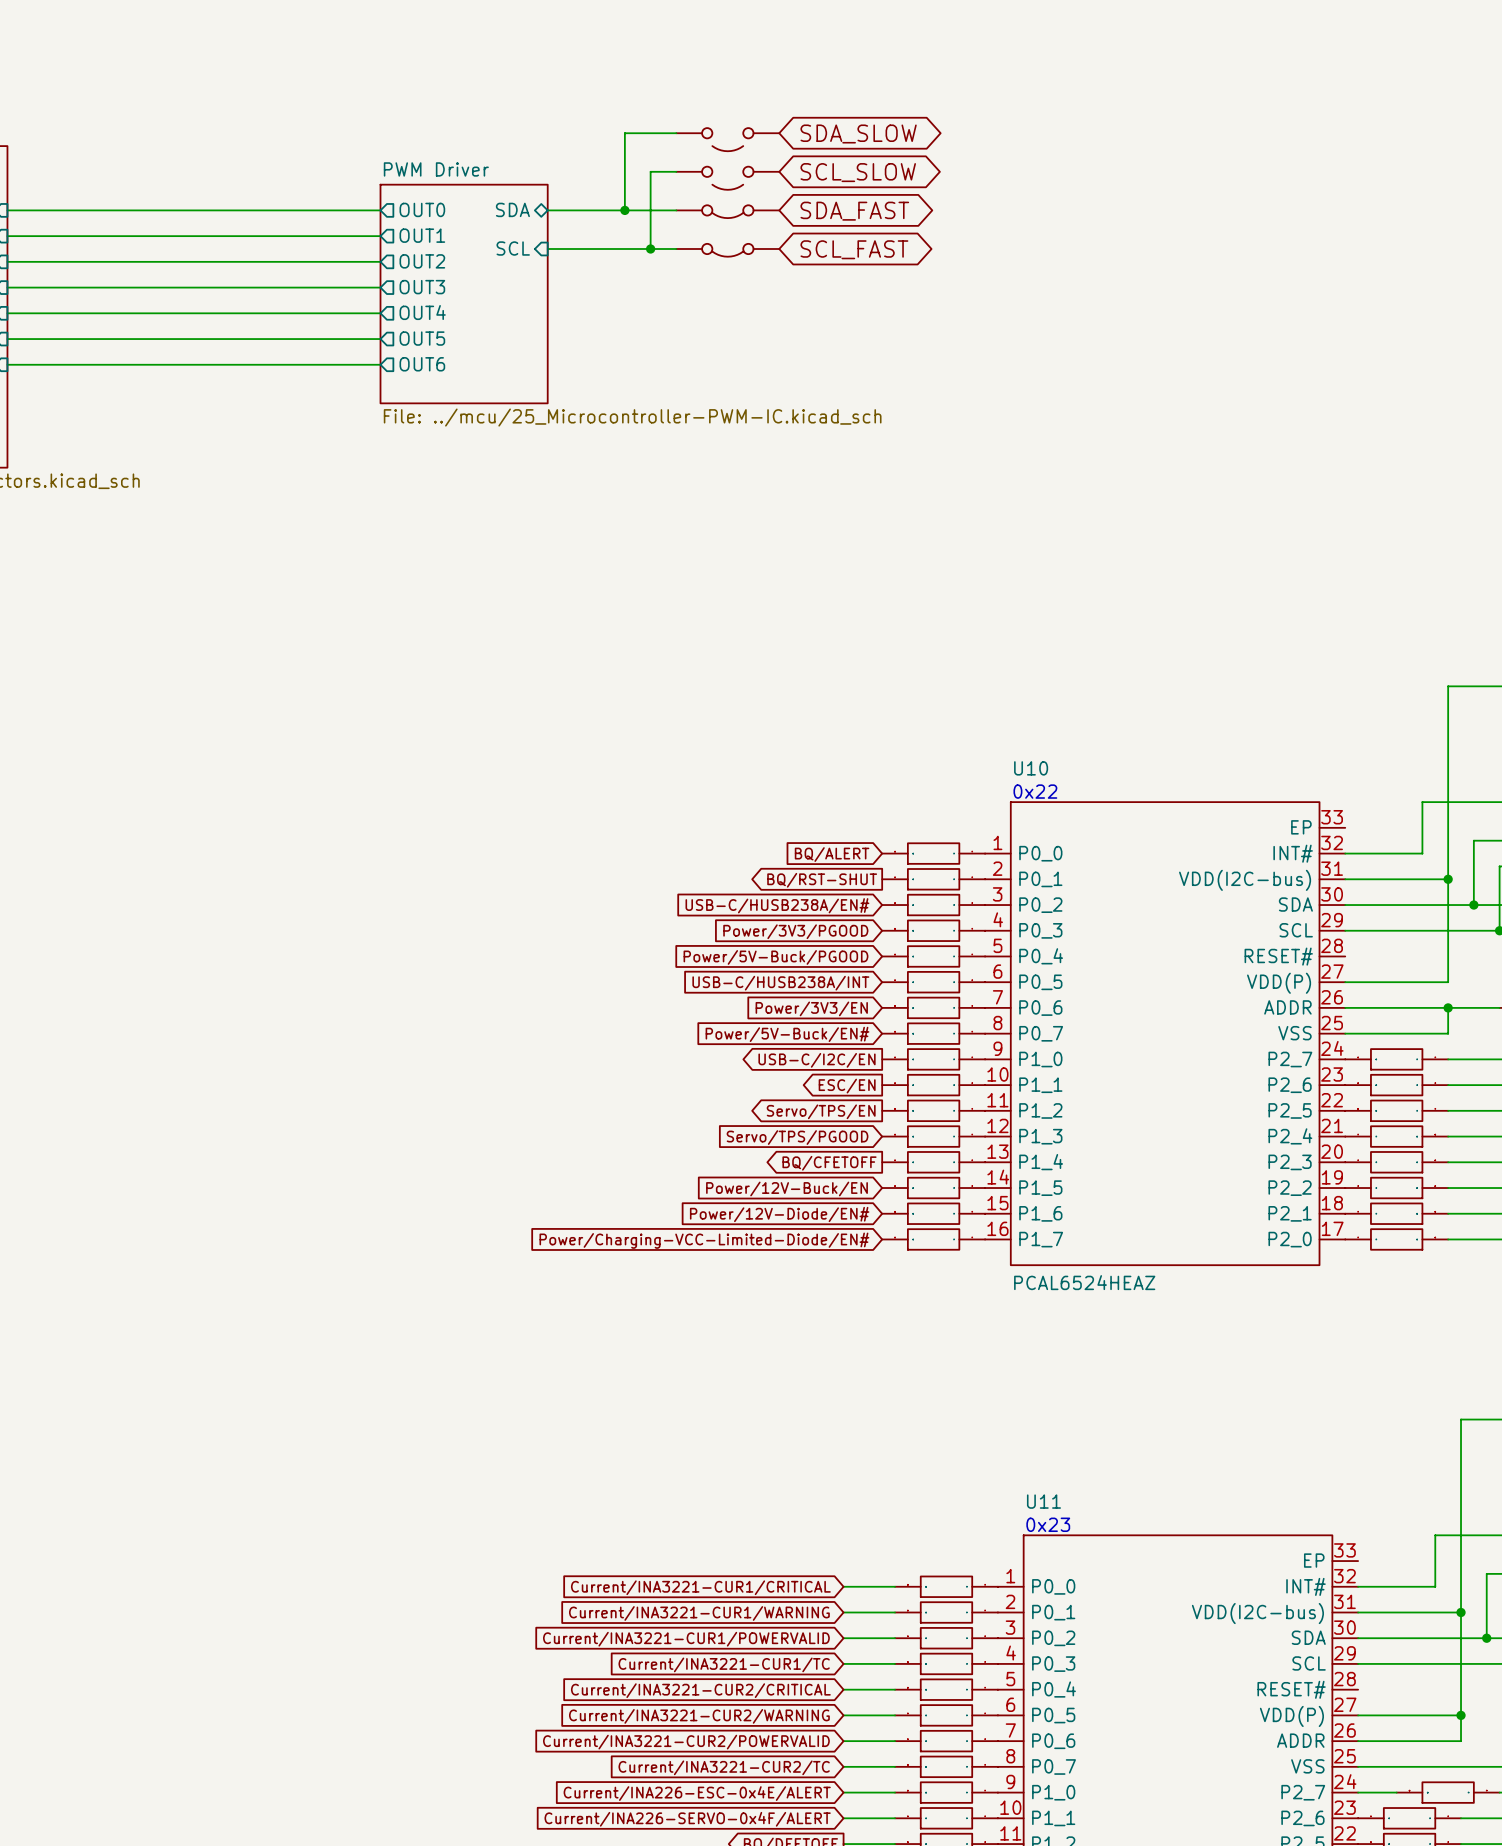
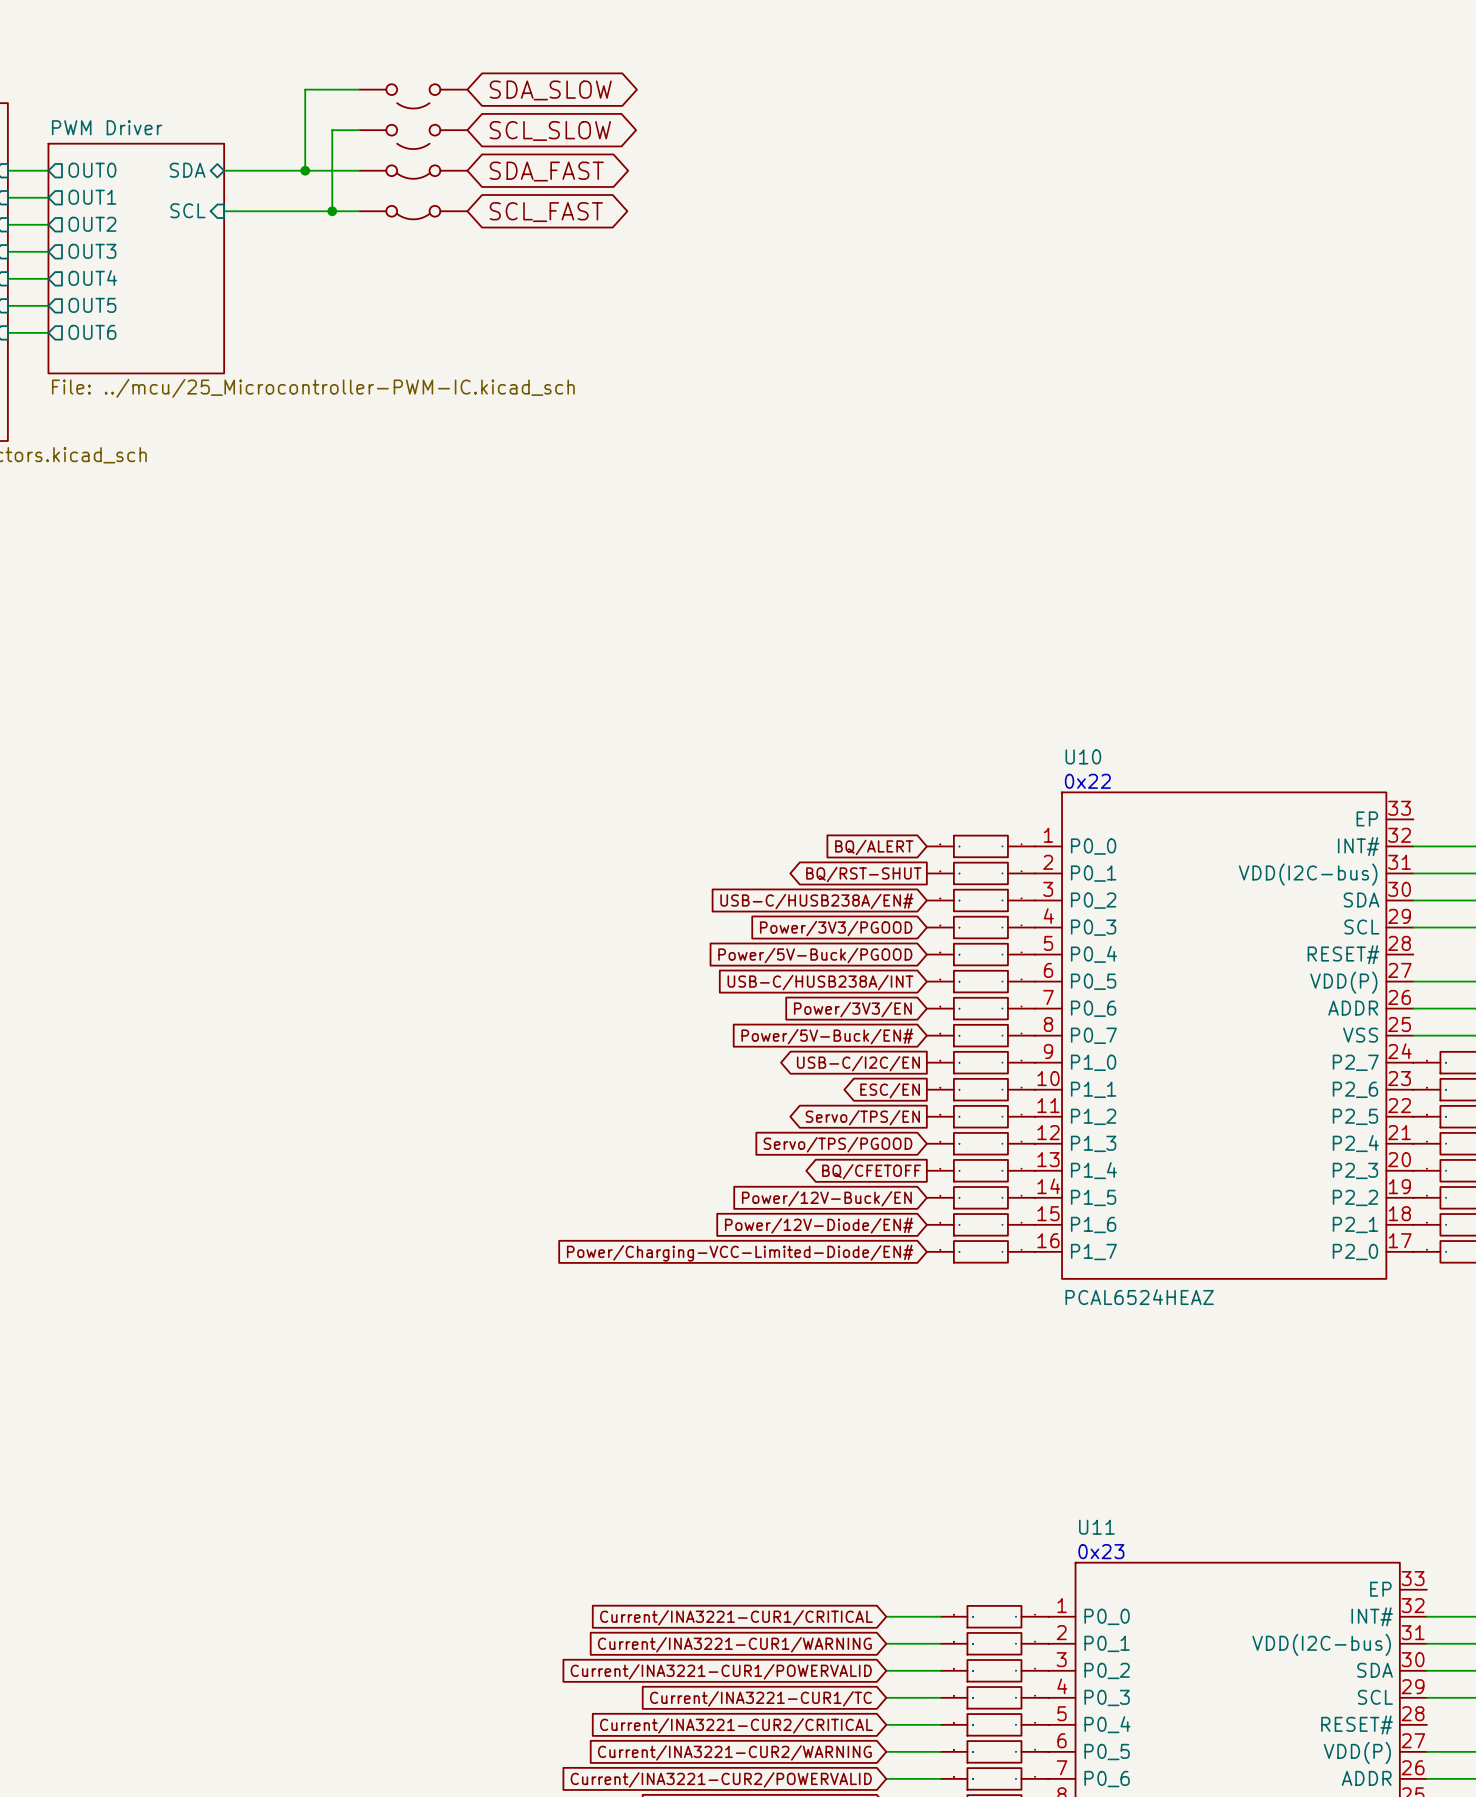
wire: none -> (359, 89) (305, 89) (305, 170)
global label: none -> SDA_SLOW (550, 90)
wire: (676, 133) (624, 133) (624, 210) -> none
global label: SDA_SLOW (858, 133) -> none
part: none -> (413, 96)
part: (727, 139) -> none
wire: none -> (359, 130) (332, 130) (332, 211)
wire: (676, 171) (650, 171) (650, 248) -> none
global label: none -> SCL_SLOW (550, 130)
global label: SCL_SLOW (858, 172) -> none
part: none -> (413, 136)
part: (727, 178) -> none
sheet pin: none -> OUT0 (92, 170)
sheet pin: none -> SDA (187, 170)
sheet pin: OUT0 (422, 209) -> none
sheet pin: SDA (512, 209) -> none
wire: (46, 210) (213, 210) -> none
junction: none -> (305, 170)
wire: (547, 210) (676, 210) -> none
junction: (624, 210) -> none
part: none -> (413, 172)
global label: none -> SDA_FAST (546, 171)
part: (727, 211) -> none
global label: SDA_FAST (854, 211) -> none
sheet pin: none -> OUT1 (92, 197)
sheet pin: OUT1 (422, 235) -> none
wire: (46, 236) (380, 236) -> none
sheet pin: none -> SCL (187, 210)
wire: none -> (224, 211) (359, 211)
junction: none -> (332, 211)
sheet pin: SCL (513, 248) -> none
wire: (547, 248) (676, 248) -> none
junction: (650, 248) -> none
global label: none -> SCL_FAST (546, 212)
global label: SCL_FAST (854, 249) -> none
part: none -> (413, 212)
part: (727, 250) -> none
wire: (46, 261) (380, 261) -> none
sheet pin: none -> OUT2 (92, 224)
sheet pin: OUT2 (422, 261) -> none
wire: (46, 287) (380, 287) -> none
sheet pin: none -> OUT3 (92, 251)
sheet pin: OUT3 (422, 287) -> none
sheet PWM Driver: none -> File: ../mcu/25_Microcontroller-PWM-IC.kicad_sch (136, 258)
sheet PWM Driver: File: ../mcu/25_Microcontroller-PWM-IC.kicad_sch (464, 294) -> none
sheet pin: none -> OUT4 (92, 278)
sheet pin: OUT4 (422, 312) -> none
wire: (46, 313) (380, 313) -> none
sheet pin: none -> OUT5 (92, 305)
sheet pin: OUT5 (422, 338) -> none
wire: (46, 339) (380, 339) -> none
wire: (46, 364) (380, 364) -> none
sheet pin: none -> OUT6 (92, 332)
sheet pin: OUT6 (422, 364) -> none

